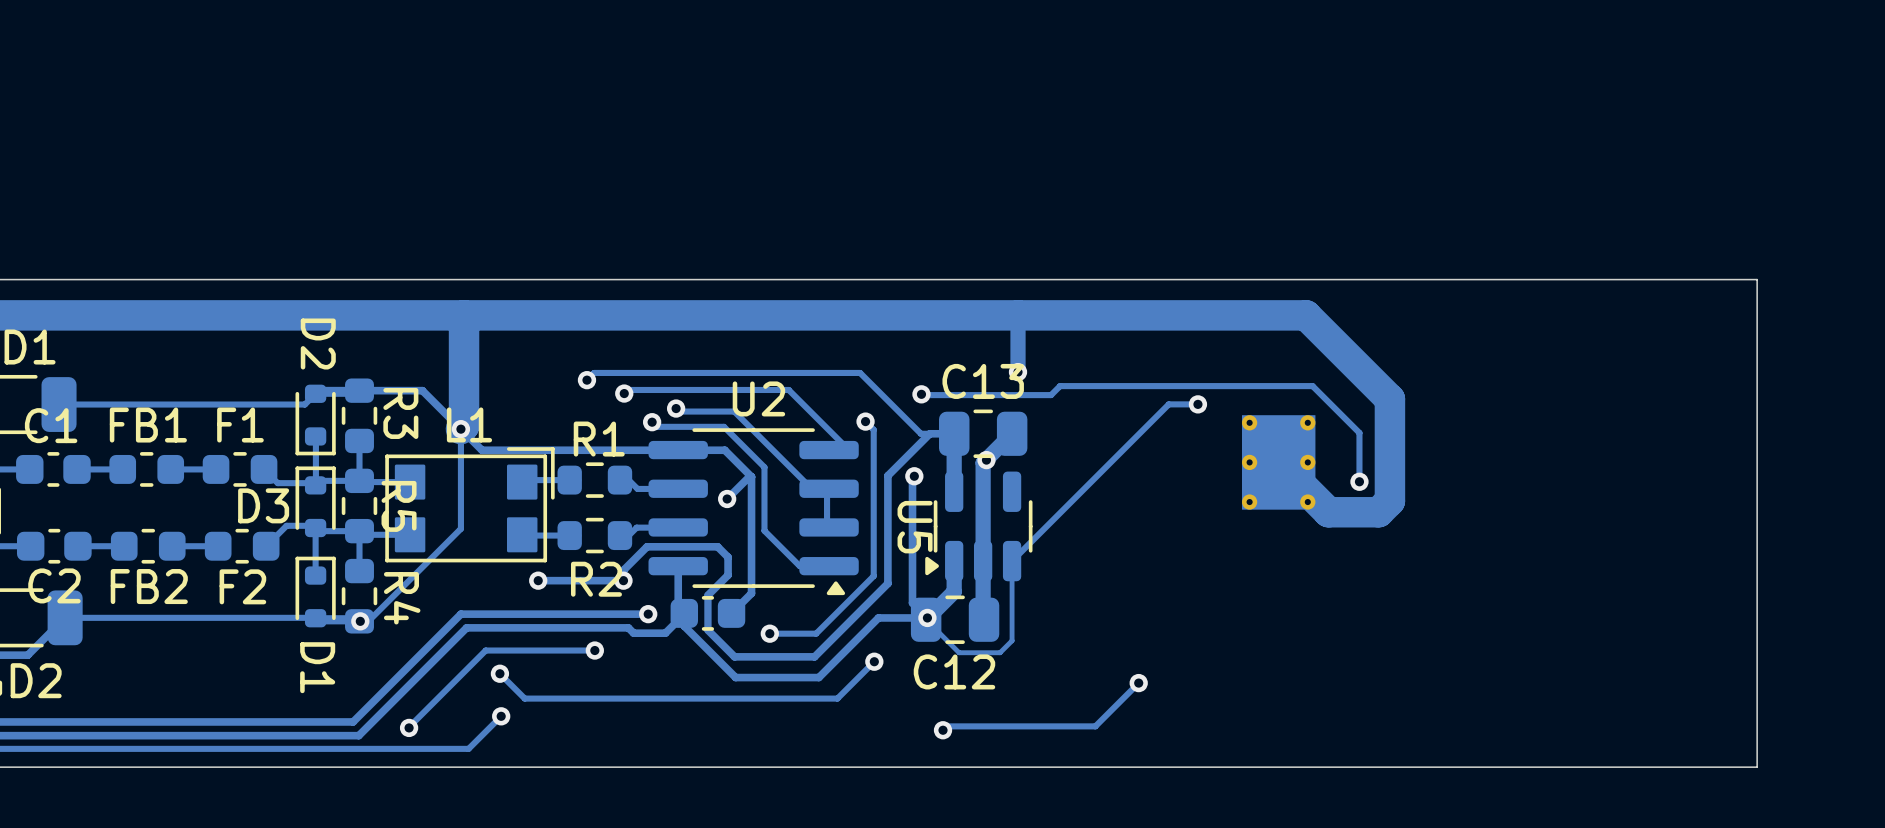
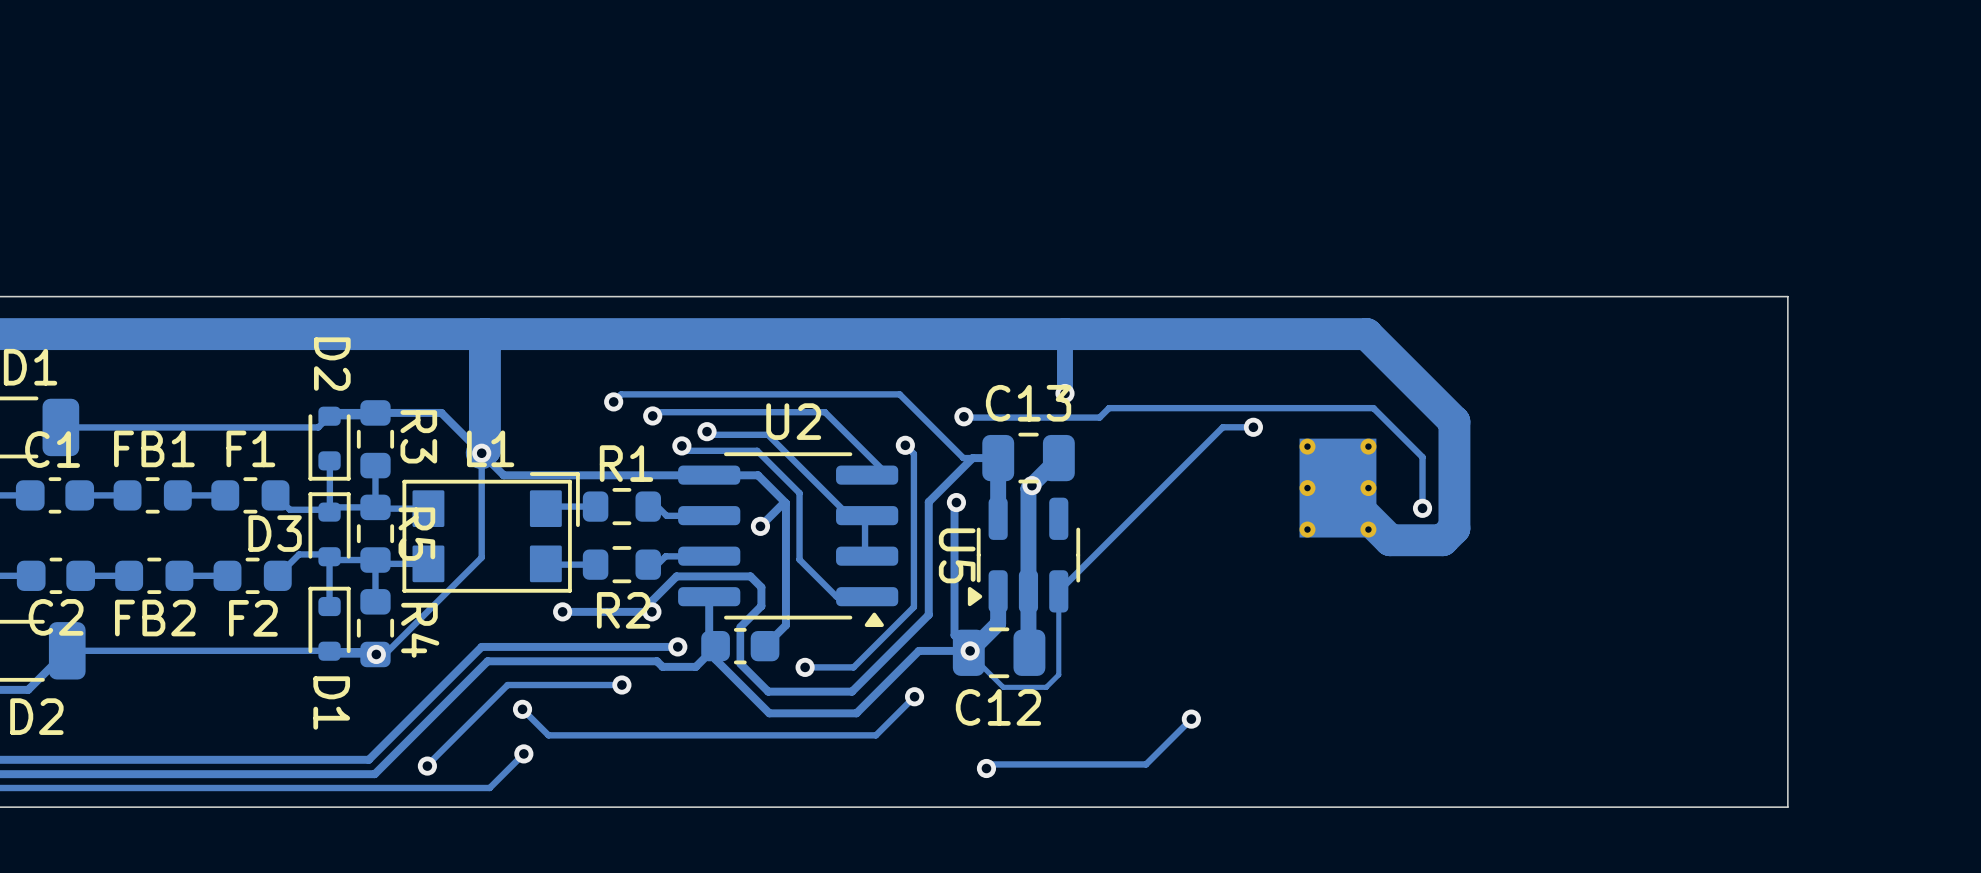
board edge: (1708, 279) (1757, 279) (1757, 767) (1708, 767) -> (1787, 296) (1787, 807)

